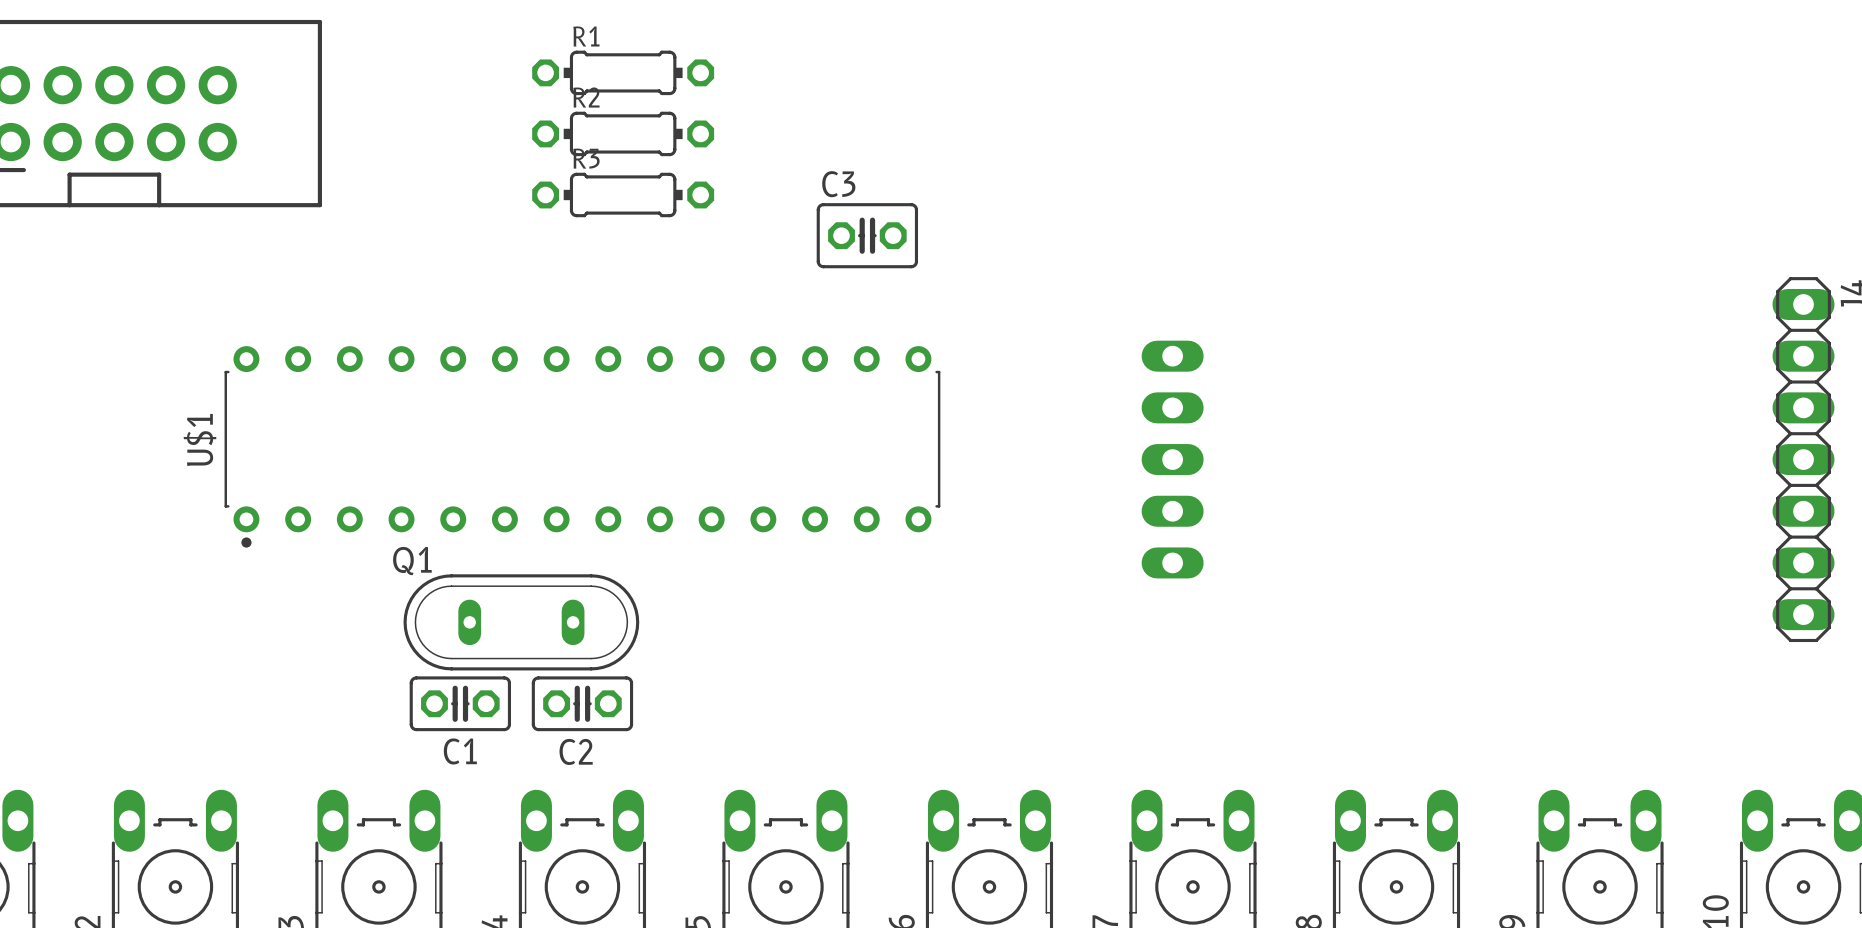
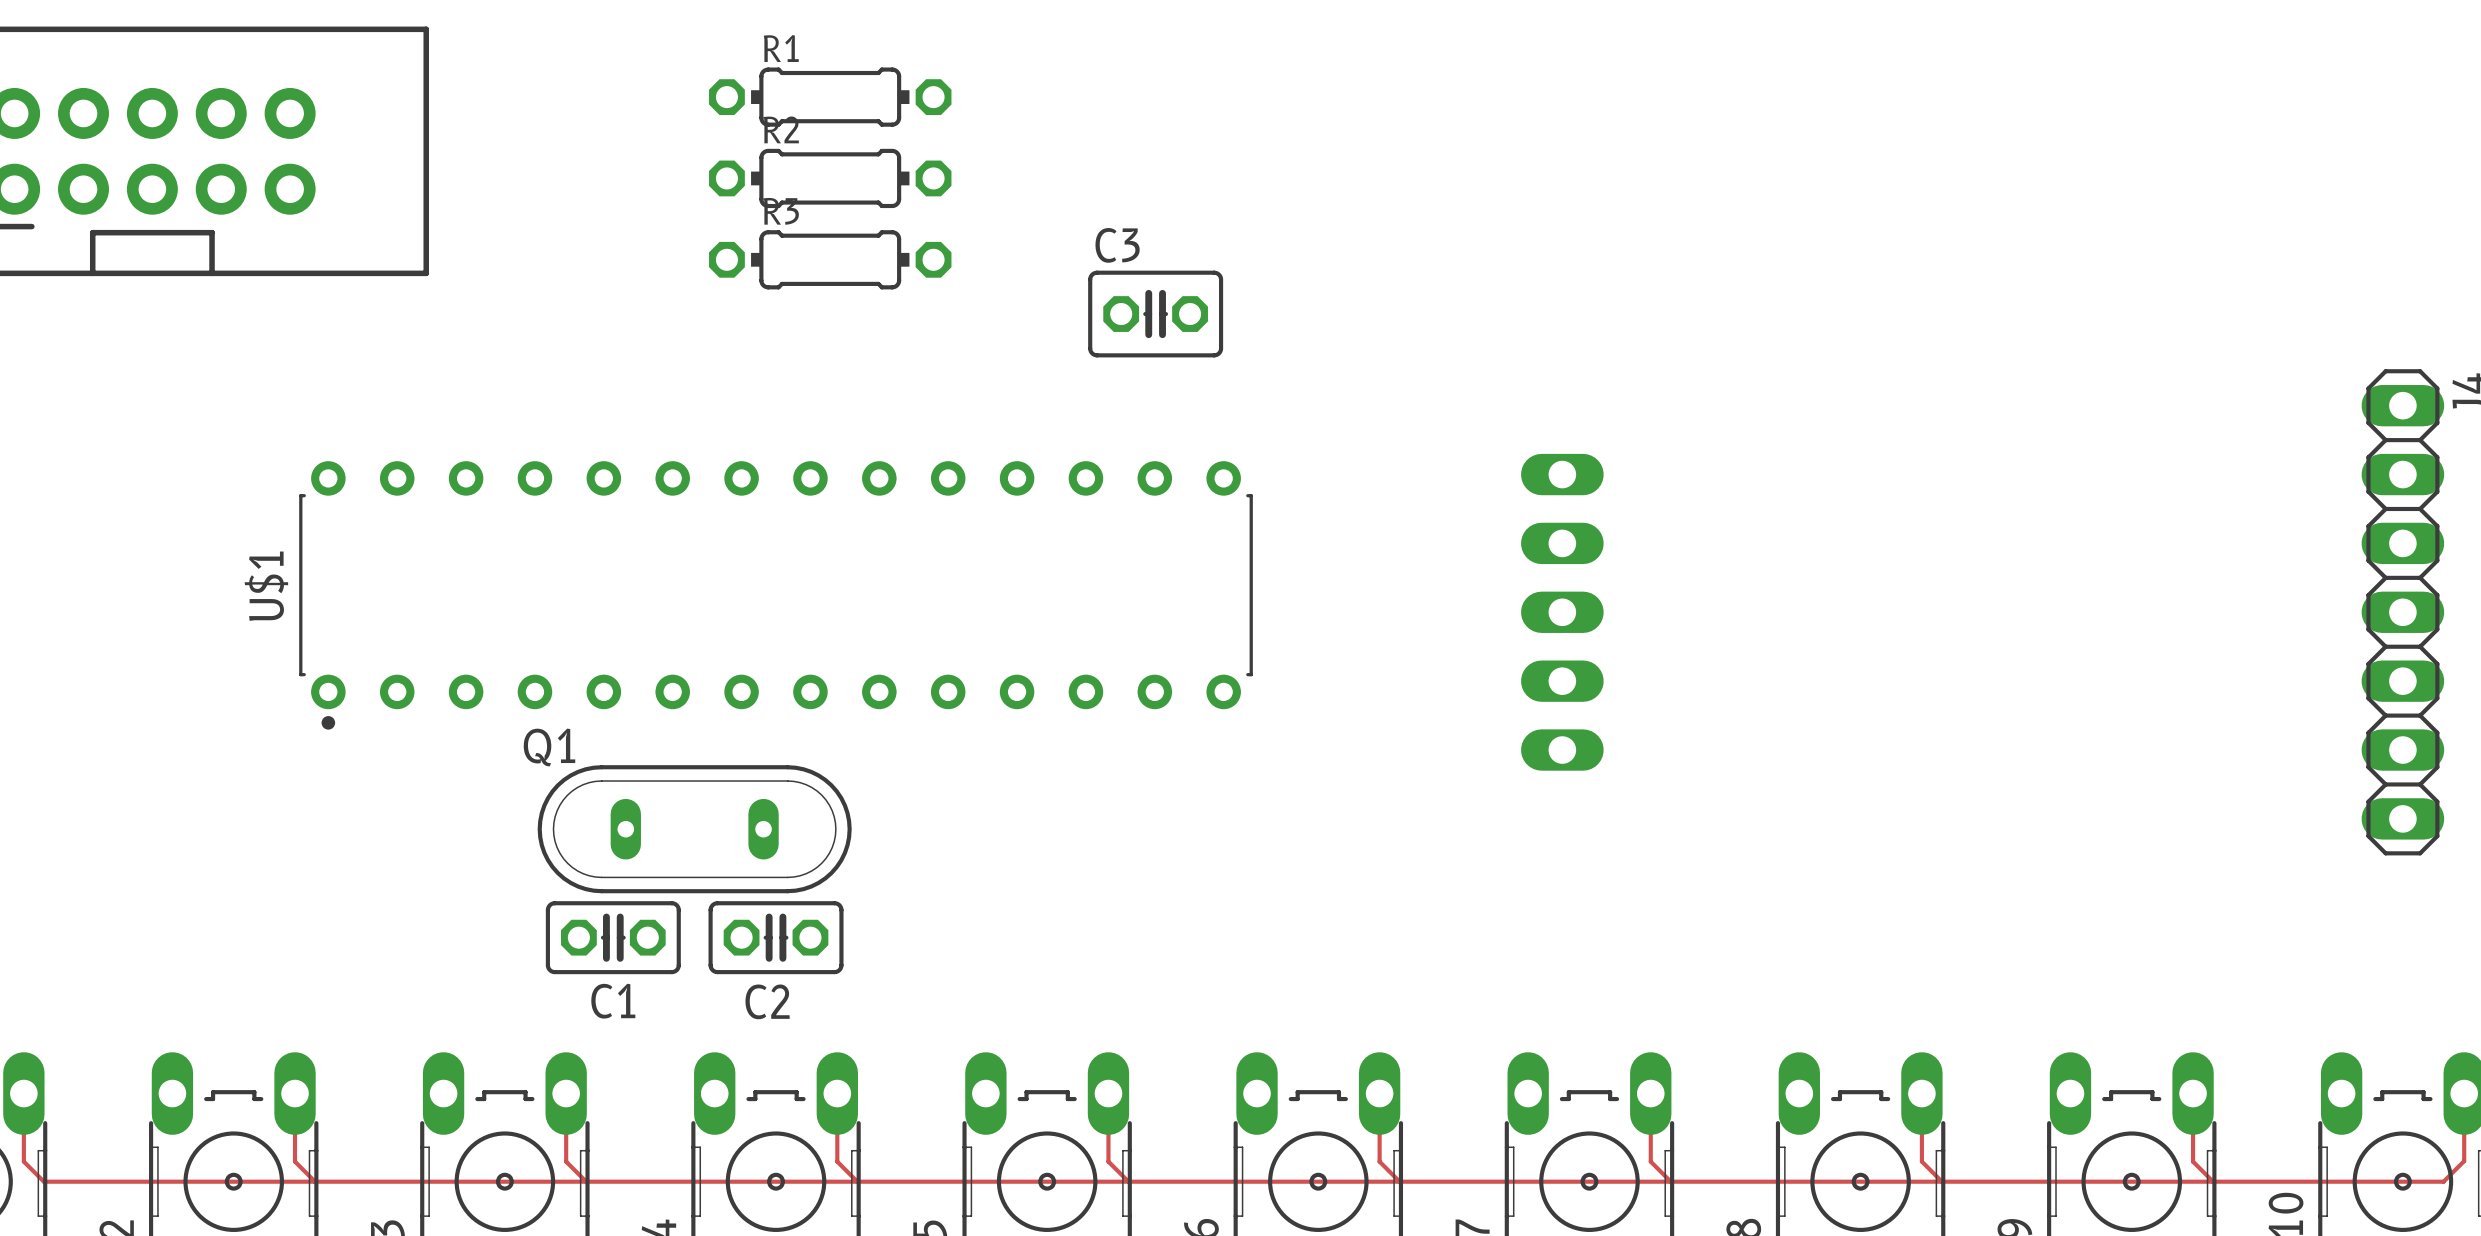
track: none -> (23, 1093) (23, 1161) (43, 1181) (2443, 1181) (2464, 1161) (2464, 1093)
track: none -> (295, 1093) (295, 1161) (315, 1181)
track: none -> (566, 1093) (566, 1161) (586, 1181)
track: none -> (837, 1093) (837, 1161) (857, 1181)
track: none -> (1108, 1093) (1108, 1161) (1128, 1181)
track: none -> (1379, 1093) (1379, 1161) (1399, 1181)
track: none -> (1650, 1093) (1650, 1161) (1670, 1181)
track: none -> (1921, 1093) (1921, 1161) (1941, 1181)
track: none -> (2193, 1093) (2193, 1161) (2213, 1181)

